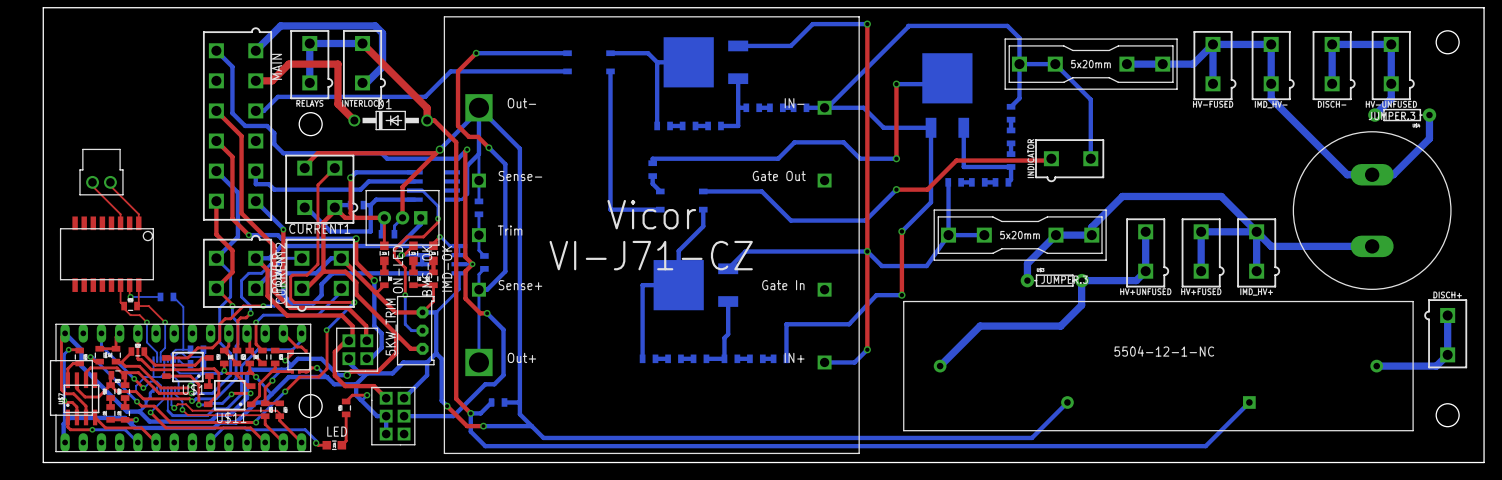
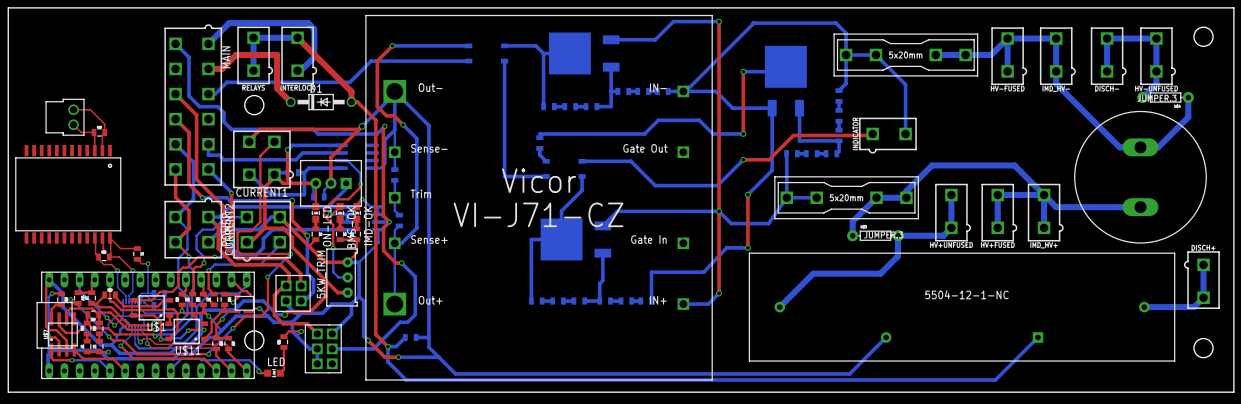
board edge: (43, 7) (43, 462) (1484, 462) -> (31, 7) (8, 7) (8, 392) (1233, 392) (1233, 387)
top track: none -> (73, 109) (90, 109) (104, 124) (102, 150)
top track: none -> (73, 124) (81, 132) (94, 133) (94, 150)
part: none -> (99, 132)
part rotation: 0° (101, 172) -> 90° counterclockwise (65, 117)
part position: (101, 172) -> (65, 117)
top track: (92, 182) (92, 186) (120, 214) (120, 223) -> none
top track: (110, 182) (110, 185) (138, 214) (138, 223) -> none
part: none -> (68, 194)
part: (106, 254) -> none
top track: none -> (110, 238) (120, 248) (137, 248)
bottom track: (130, 296) (160, 296) -> none
via: (130, 296) -> none
part side: bottom (166, 296) -> top (137, 253)
bottom track: (173, 296) (183, 306) (183, 314) -> none
top track: none -> (137, 259) (141, 263) (147, 263)
via: none -> (147, 263)
bottom track: (543, 437) (1031, 437) -> none
bottom track: (485, 446) (551, 446) -> (448, 367) (455, 373)
bottom track: none -> (400, 373) (406, 380) (995, 380) (1001, 373)
bottom track: (1023, 446) (1205, 446) -> (849, 373) (856, 367)

